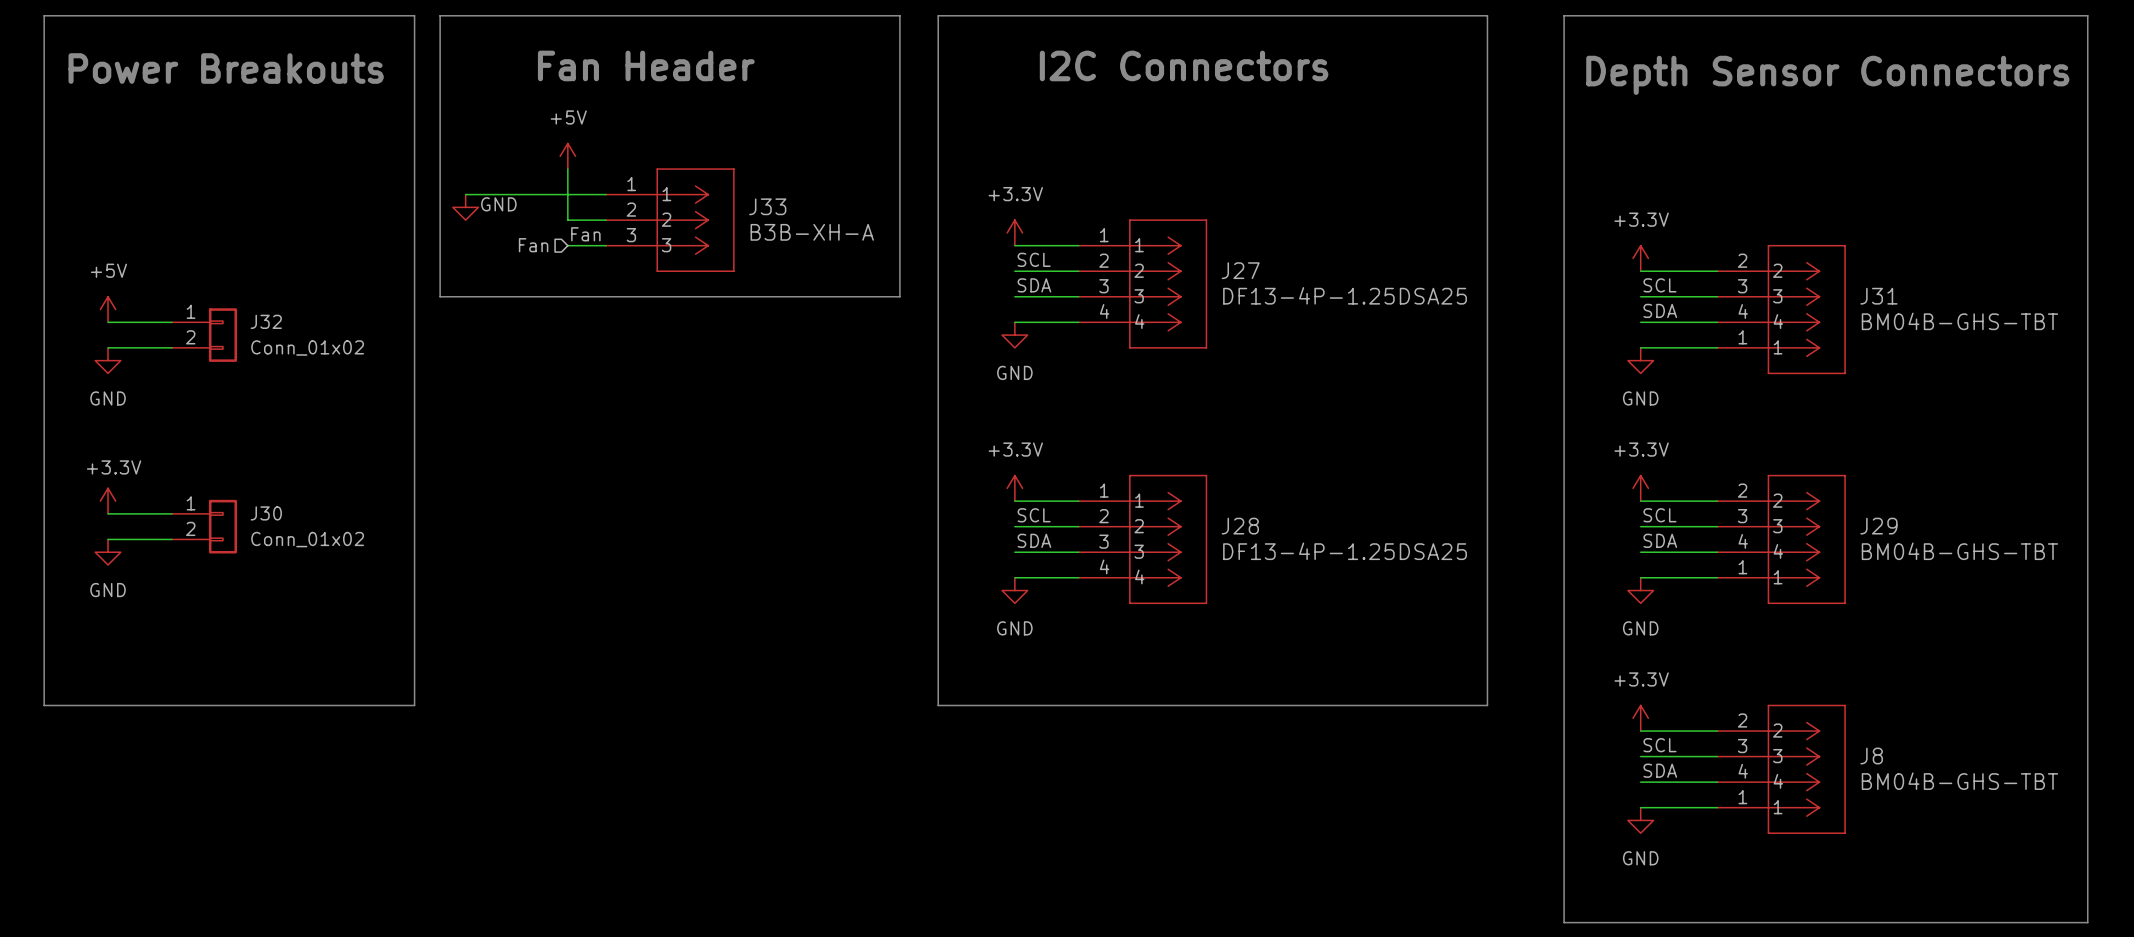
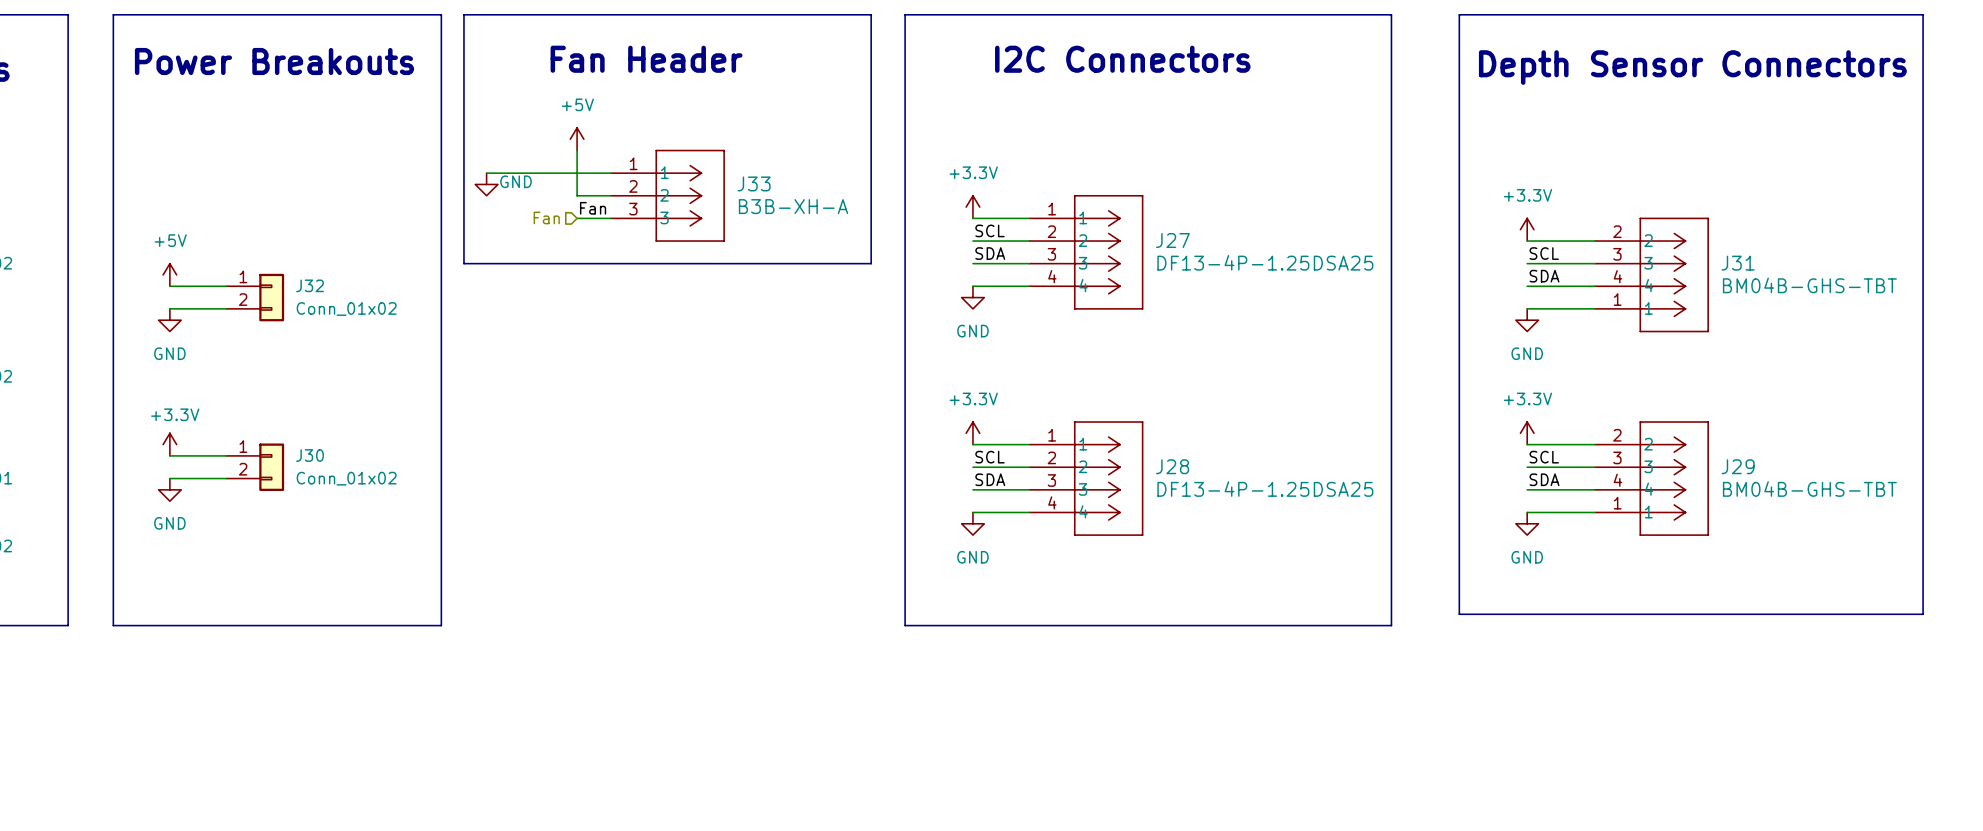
line: (1564, 692) (1564, 922) (2087, 922) (2087, 692) -> (1459, 614) (1923, 614)
power symbol: +3.3V (1640, 718) -> none
wire: (1640, 731) (1717, 731) -> none
label: SCL (1659, 745) -> none
wire: (1640, 756) (1717, 756) -> none
J8: BM04B-GHS-TBT (1781, 769) -> none
label: SDA (1660, 770) -> none
wire: (1640, 782) (1717, 782) -> none
wire: (1640, 807) (1717, 807) -> none
power symbol: GND (1640, 820) -> none

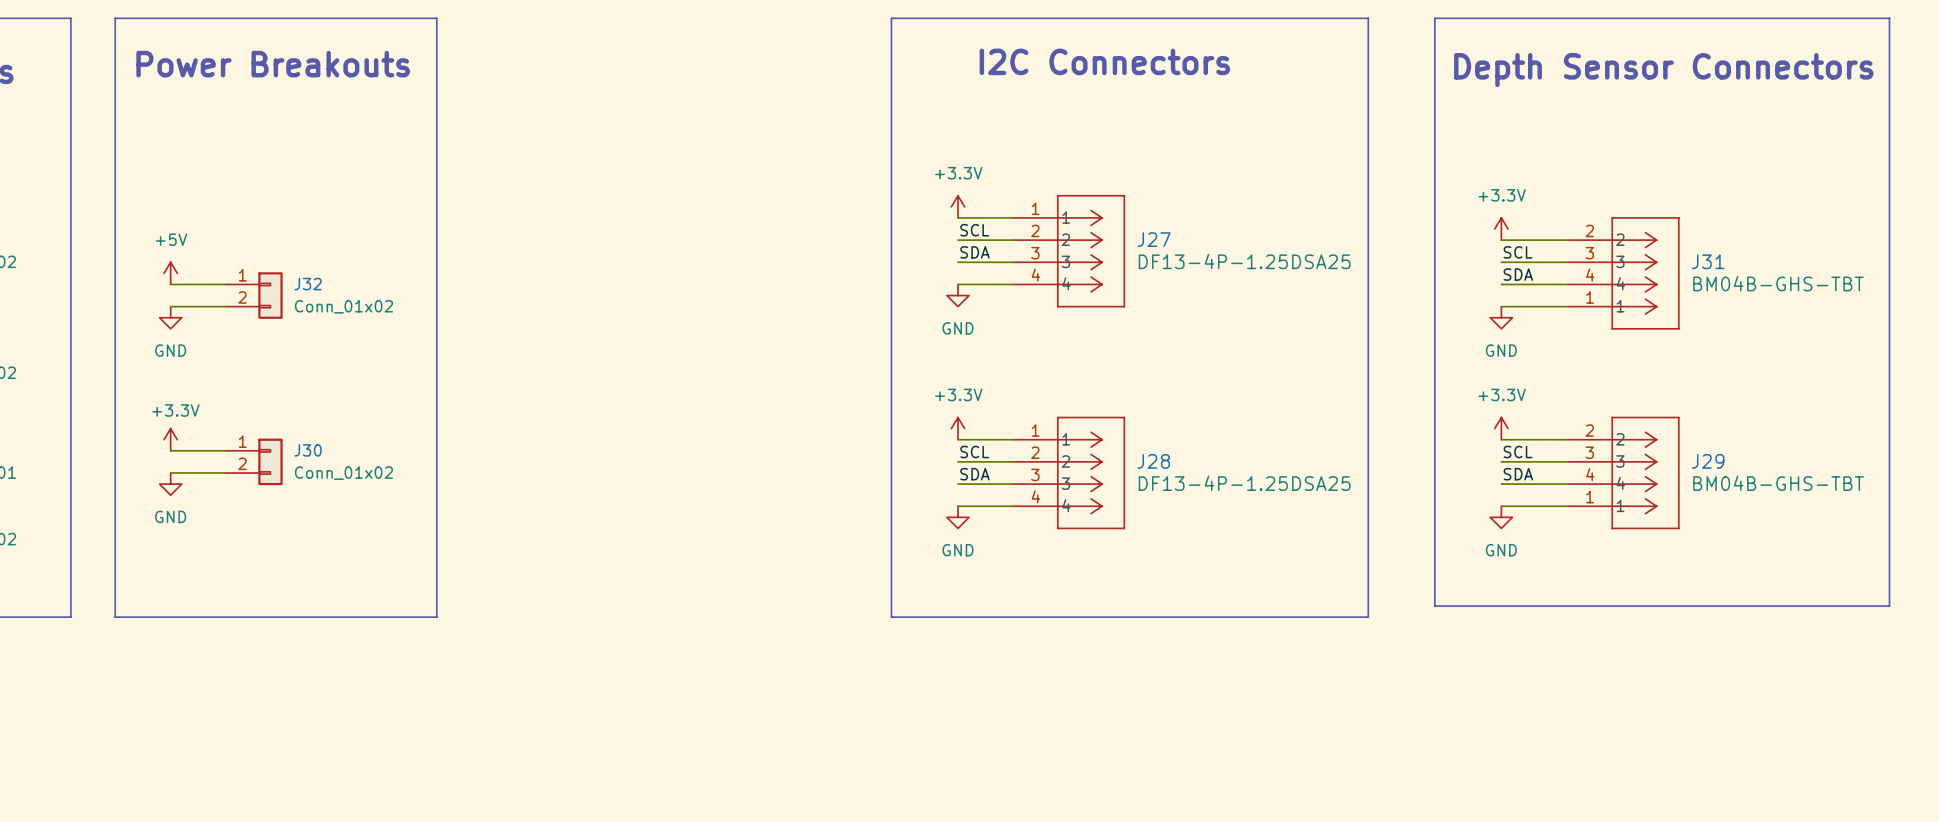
line: (463, 14) (871, 14) (871, 263) (463, 263) (463, 14) -> none
text: Fan Header (646, 59) -> none
power symbol: +5V (577, 139) -> none
wire: (577, 150) (577, 195) (611, 195) -> none
wire: (486, 173) (611, 173) -> none
power symbol: GND (486, 184) -> none
J33: B3B-XH-A (667, 195) -> none
label: Fan (593, 208) -> none
hierarchical label: Fan (546, 217) -> none
wire: (577, 218) (611, 218) -> none

